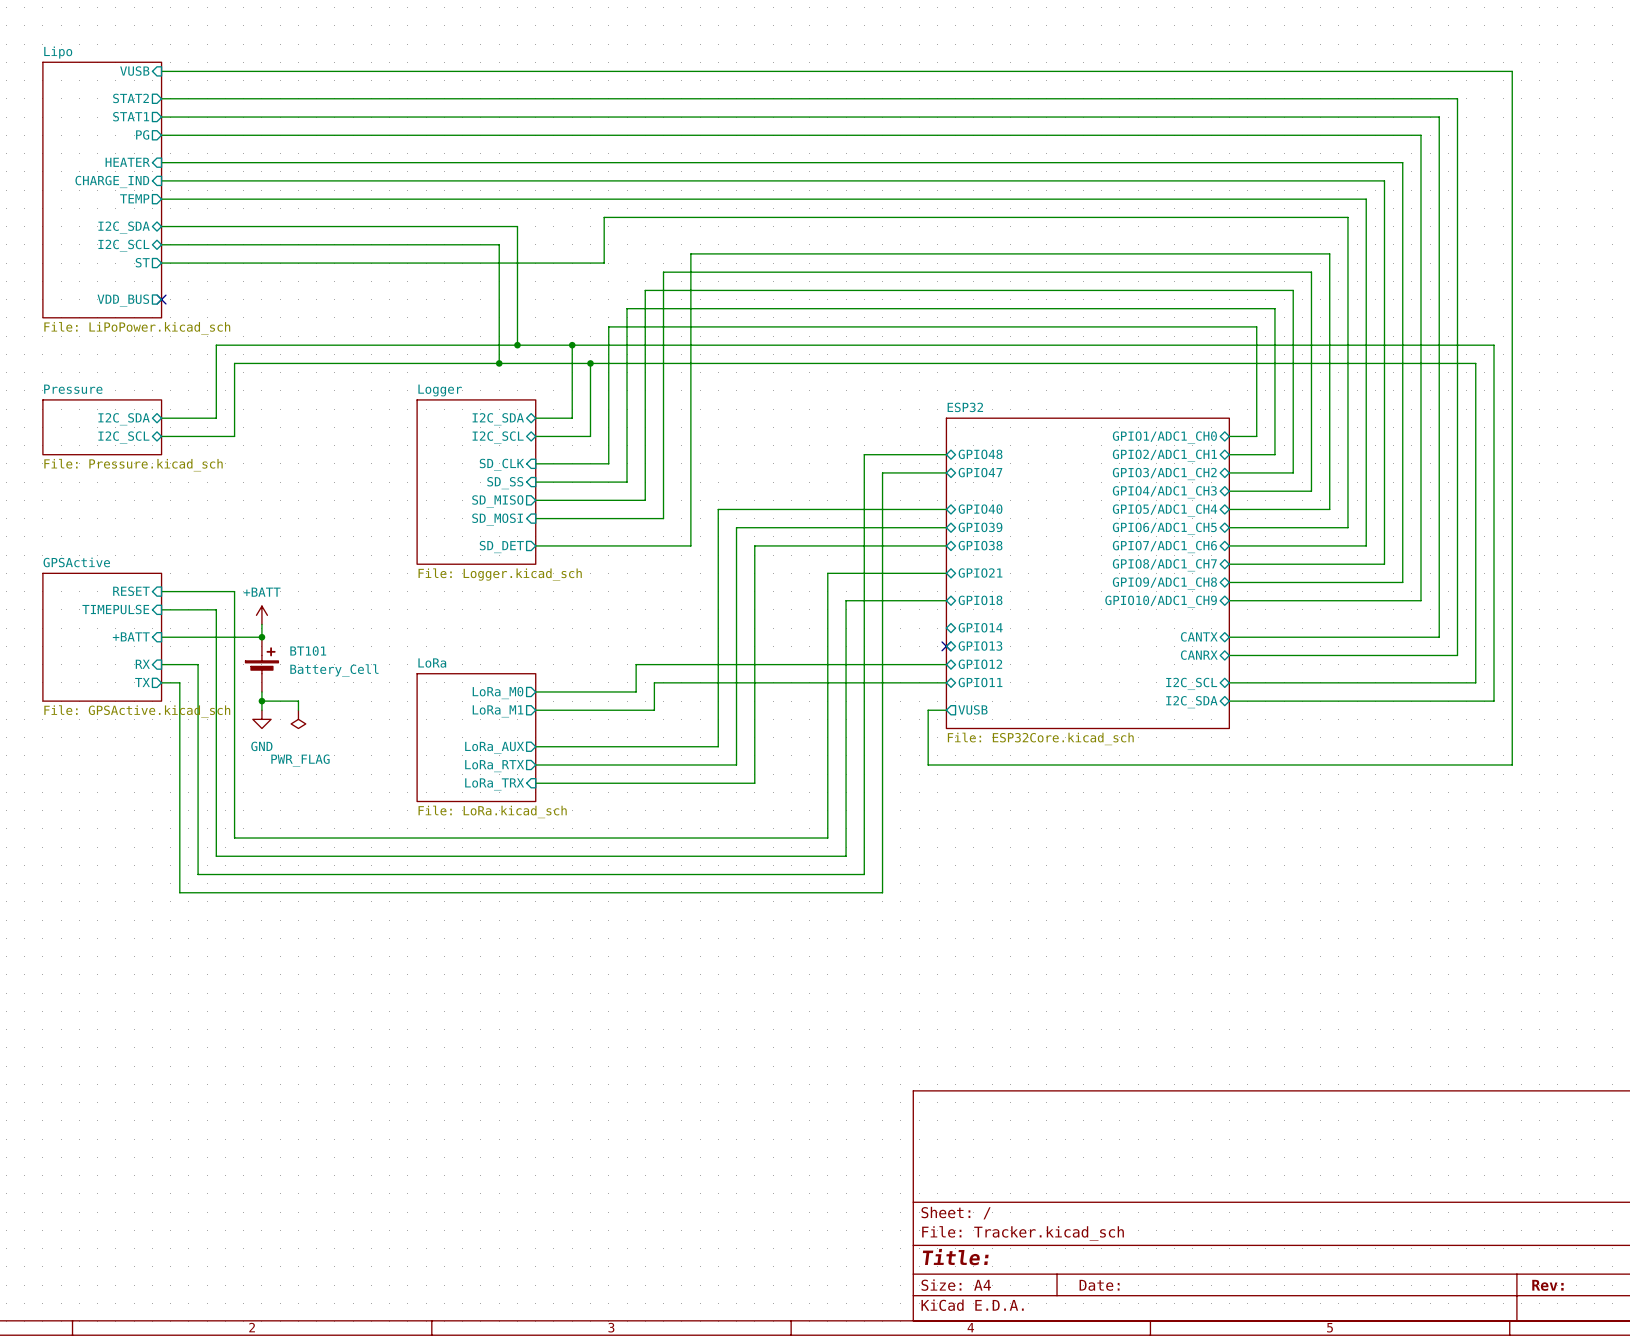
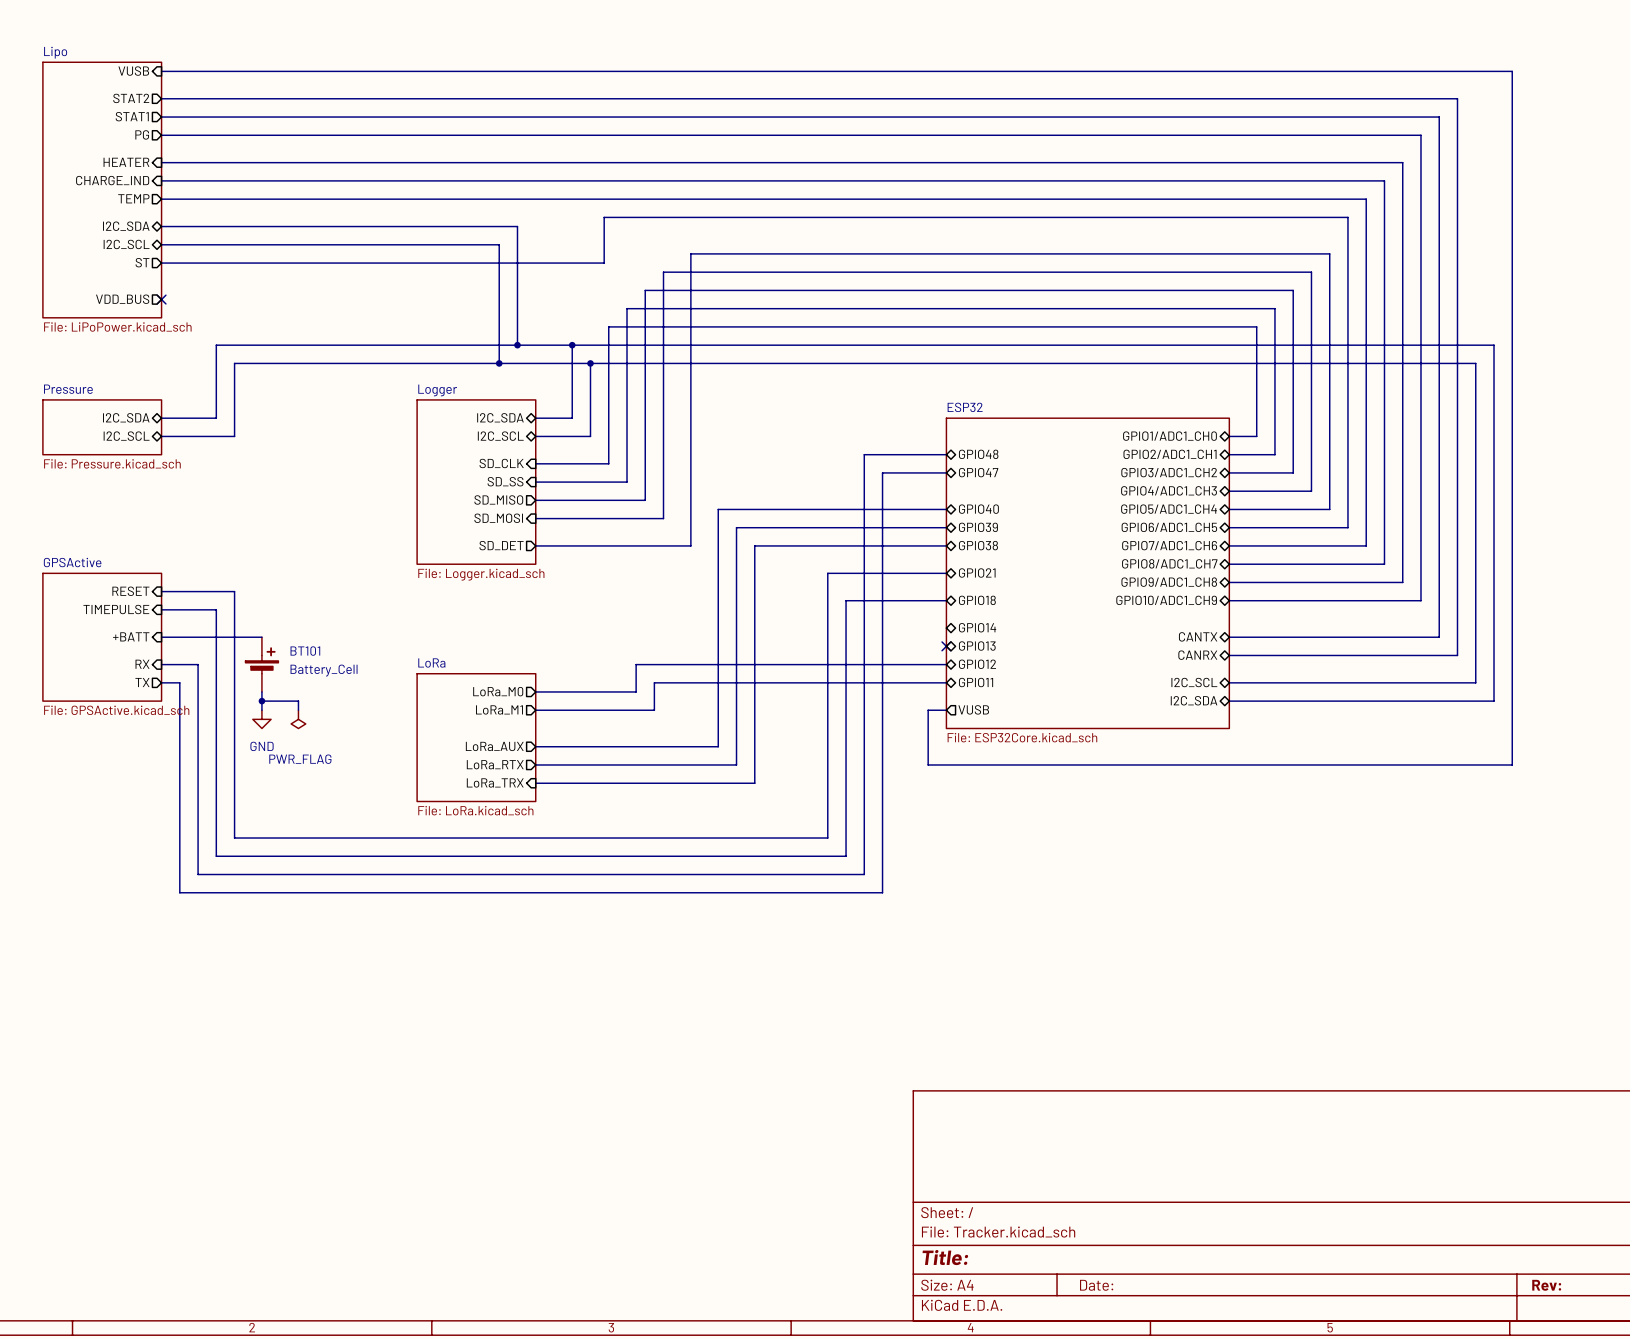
power symbol: +BATT (261, 615) -> none
wire: (261, 624) (261, 637) -> none
junction: (261, 637) -> none

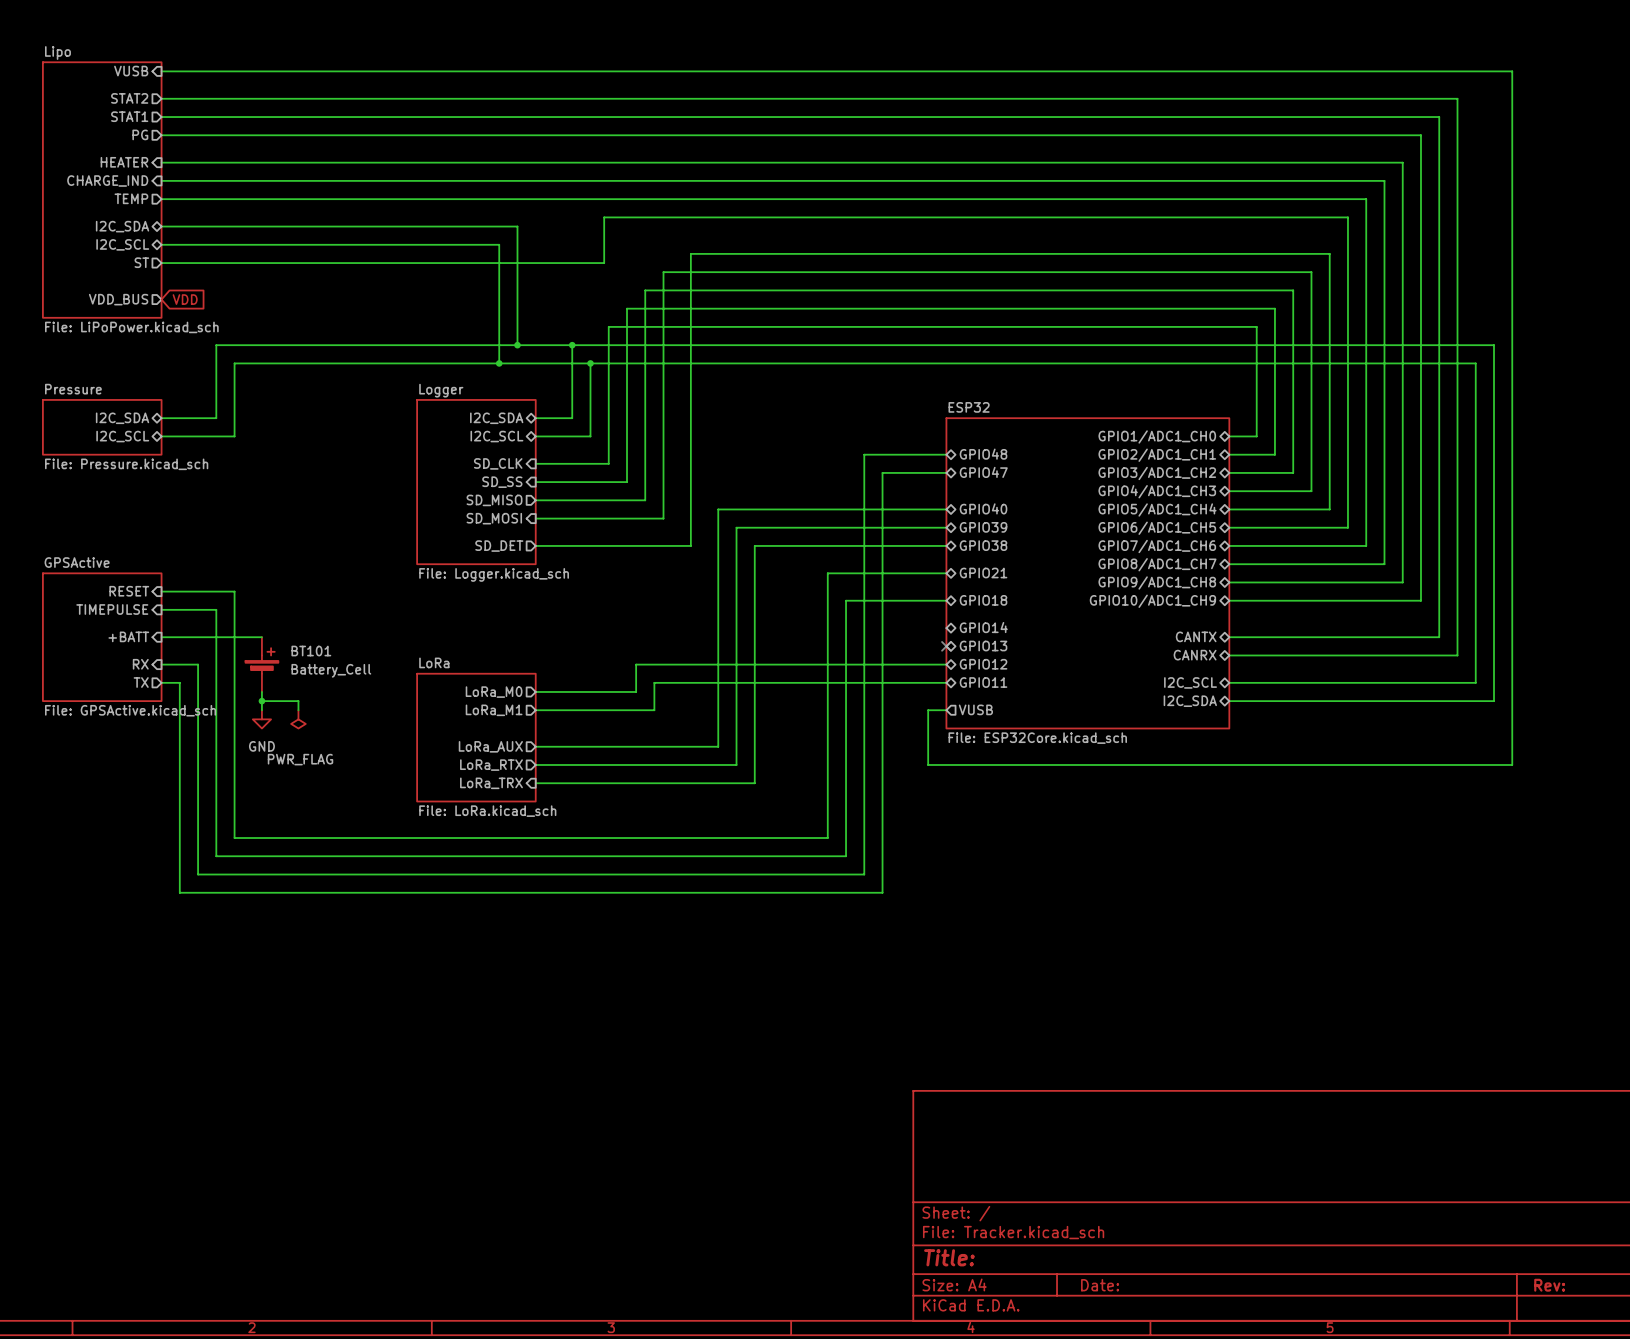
no-connect mark: (161, 299) -> none
global label: none -> VDD (185, 299)

